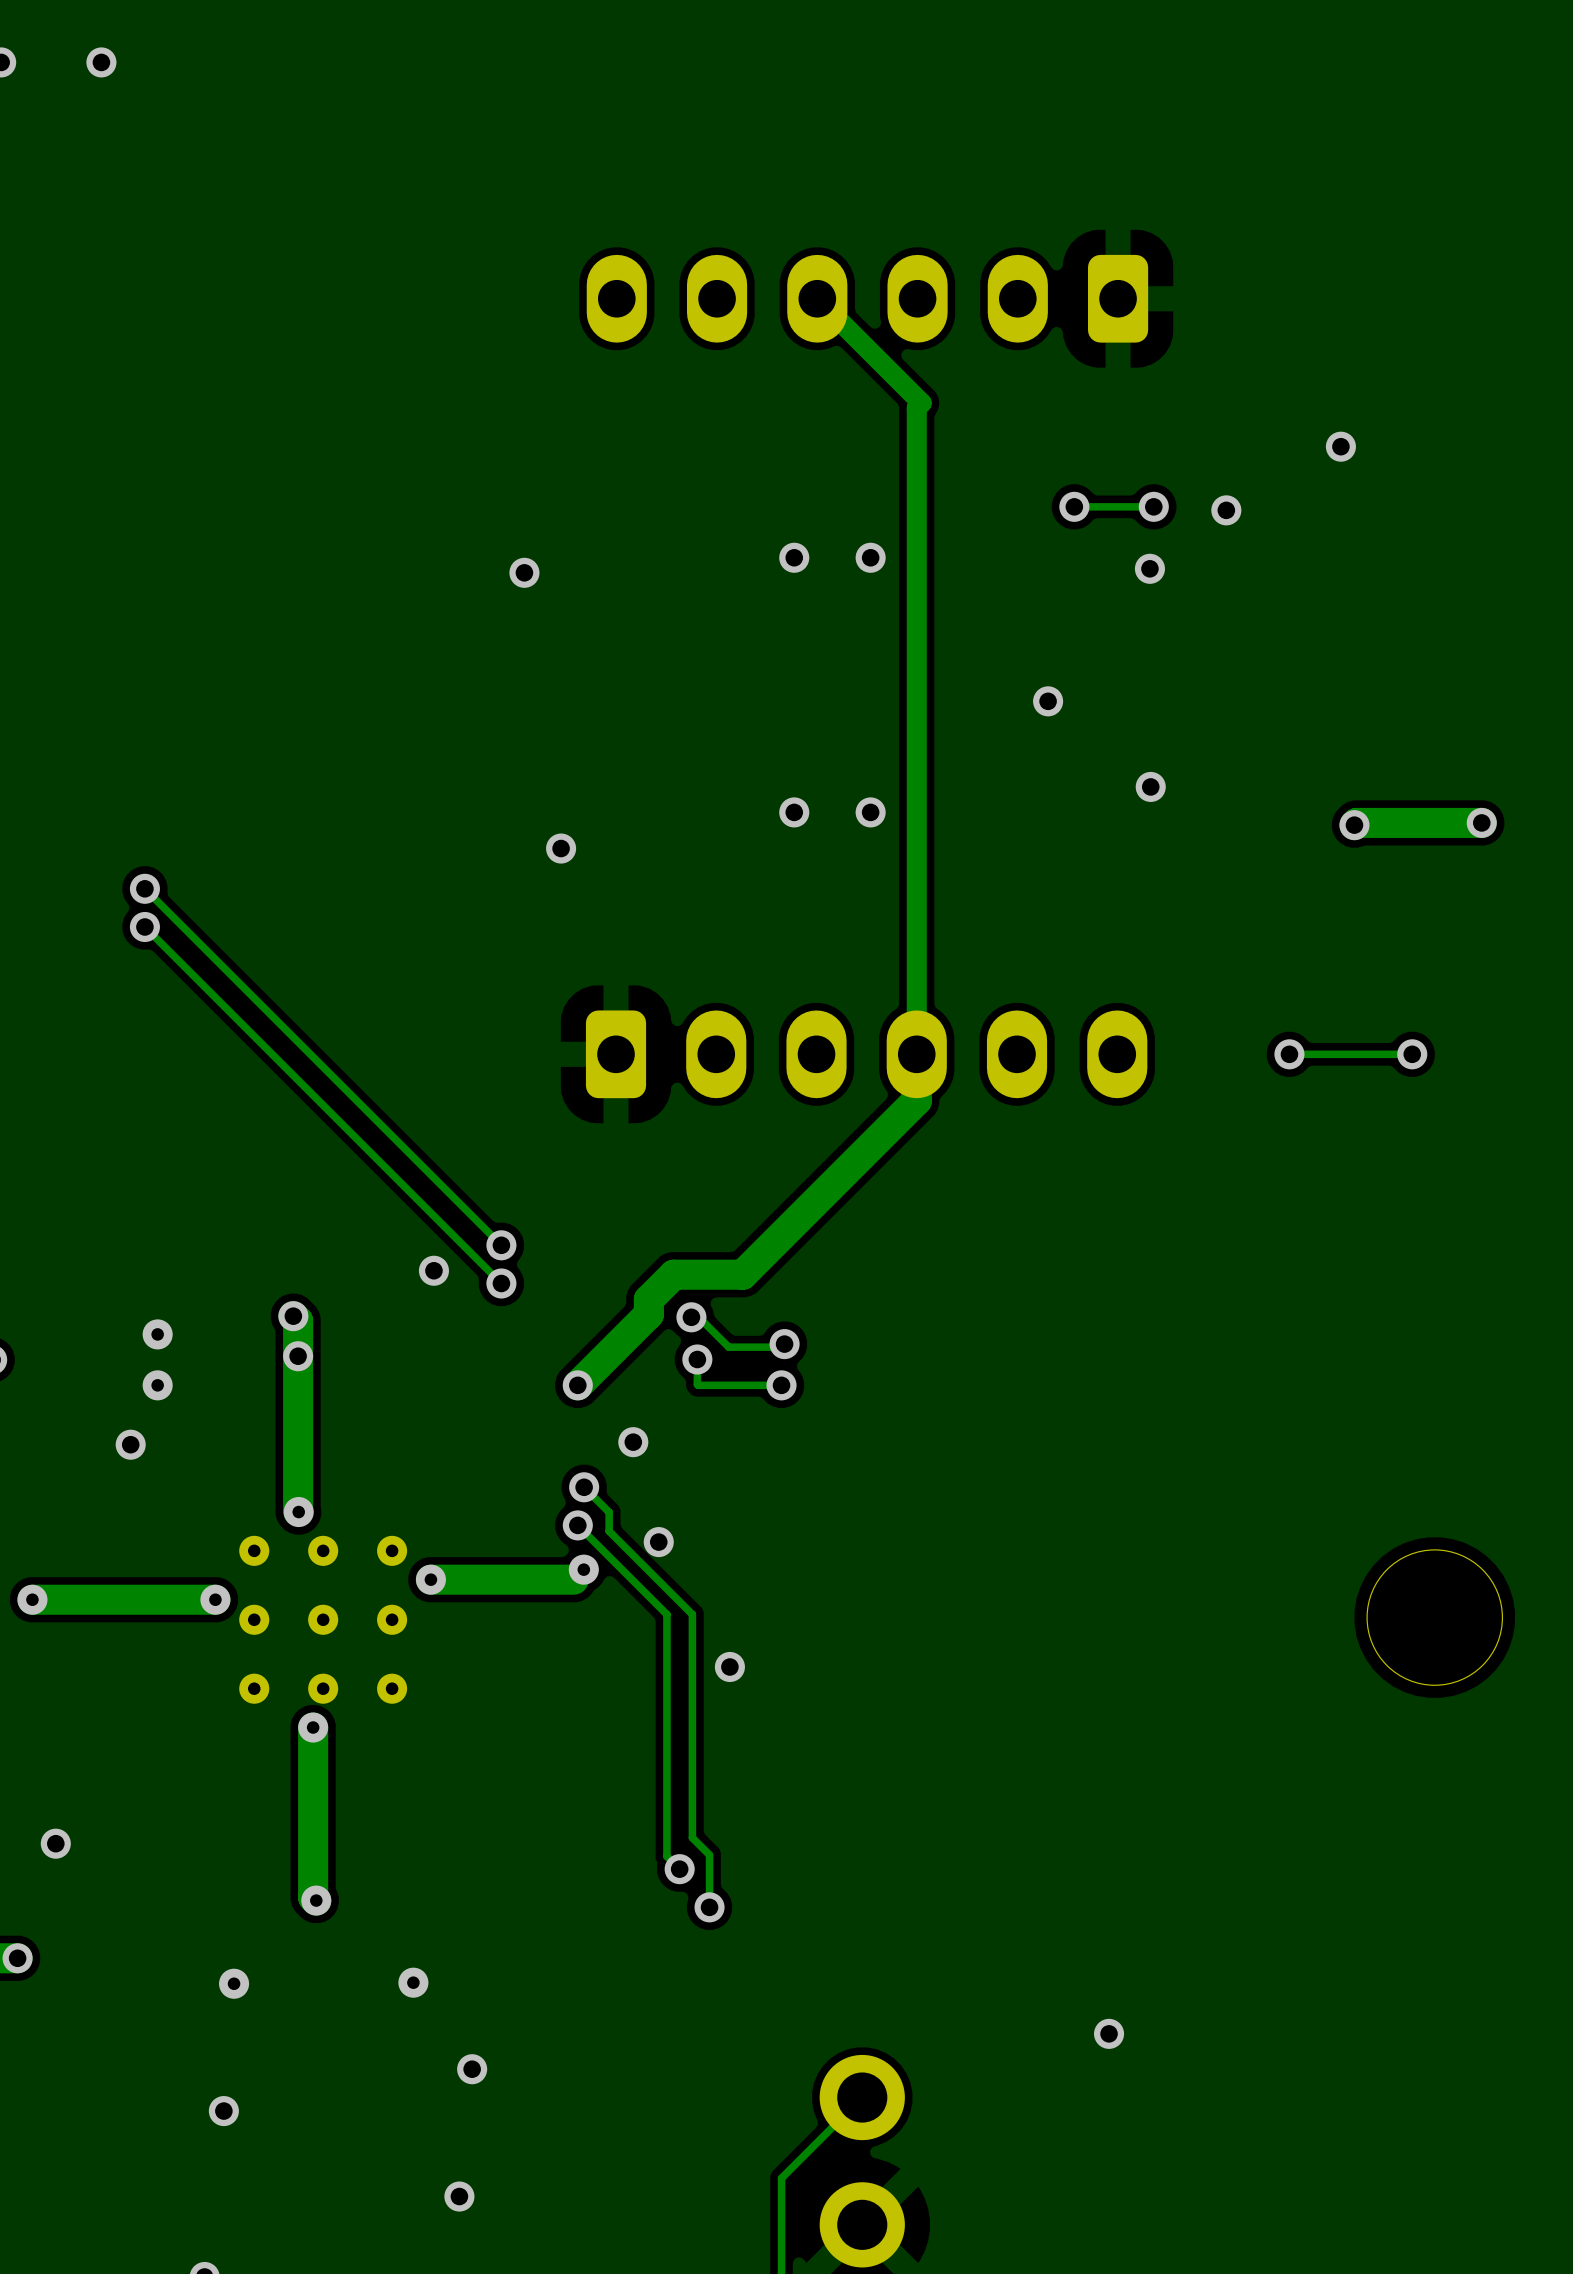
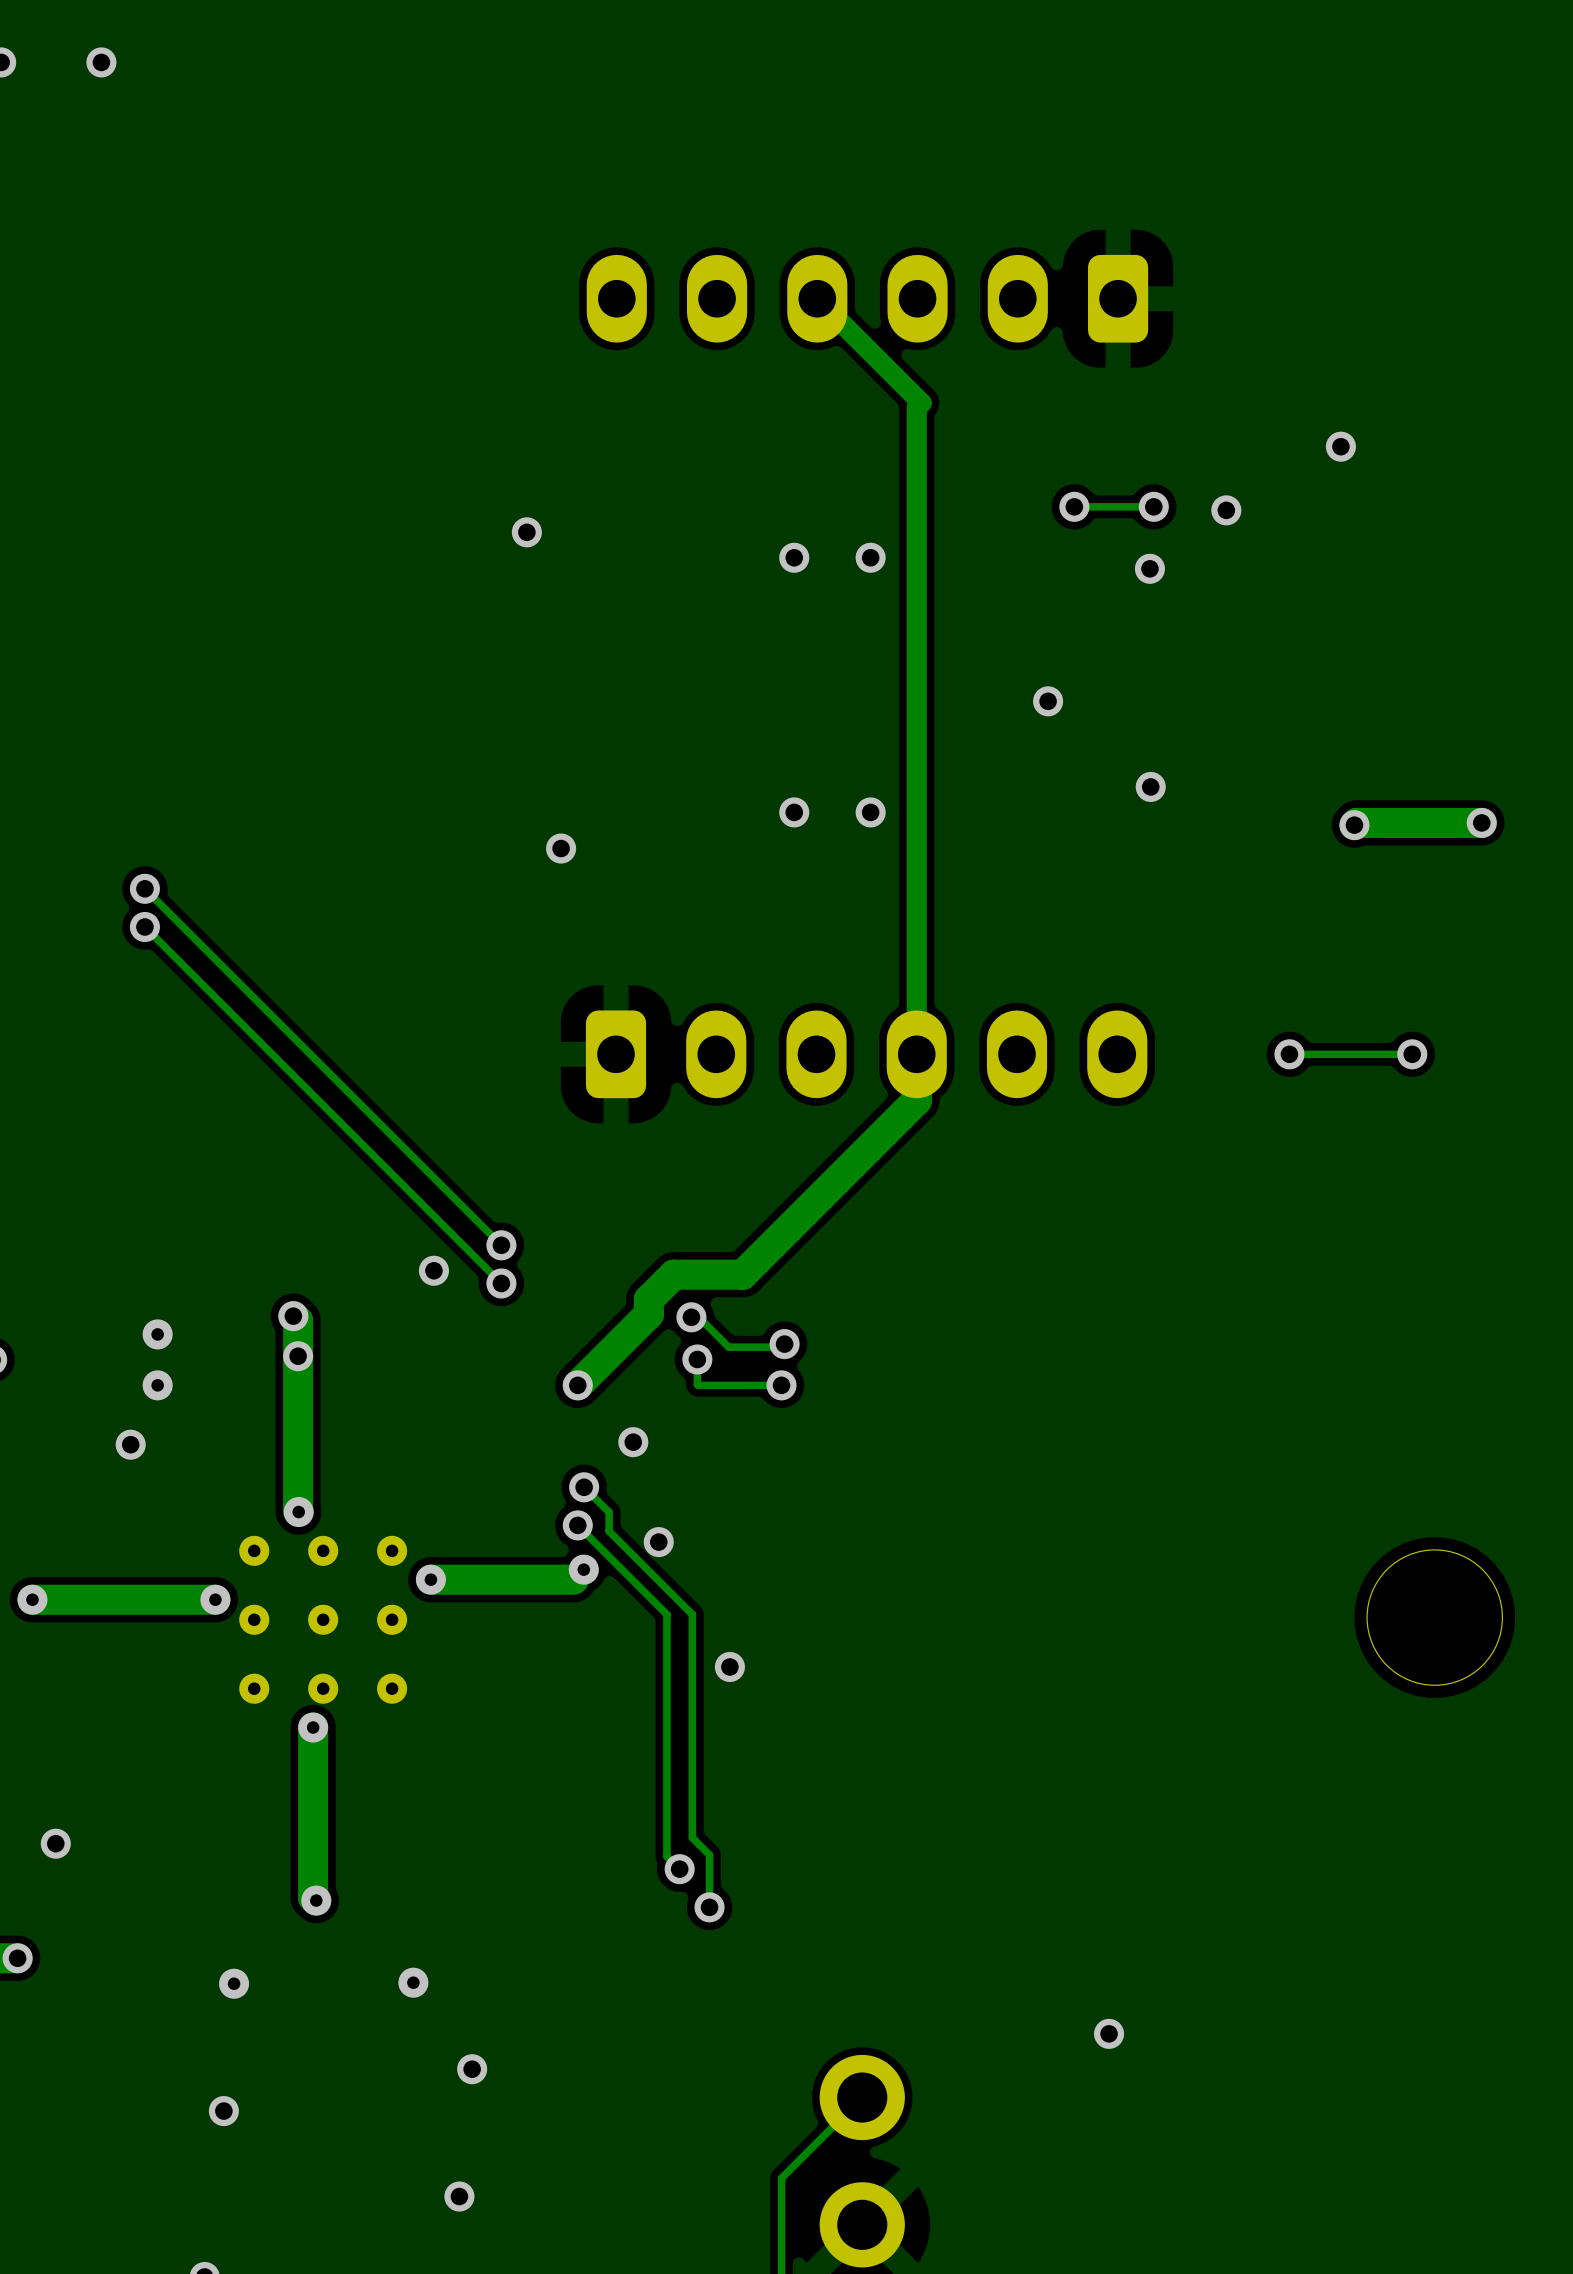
via position: (524, 572) -> (526, 532)

